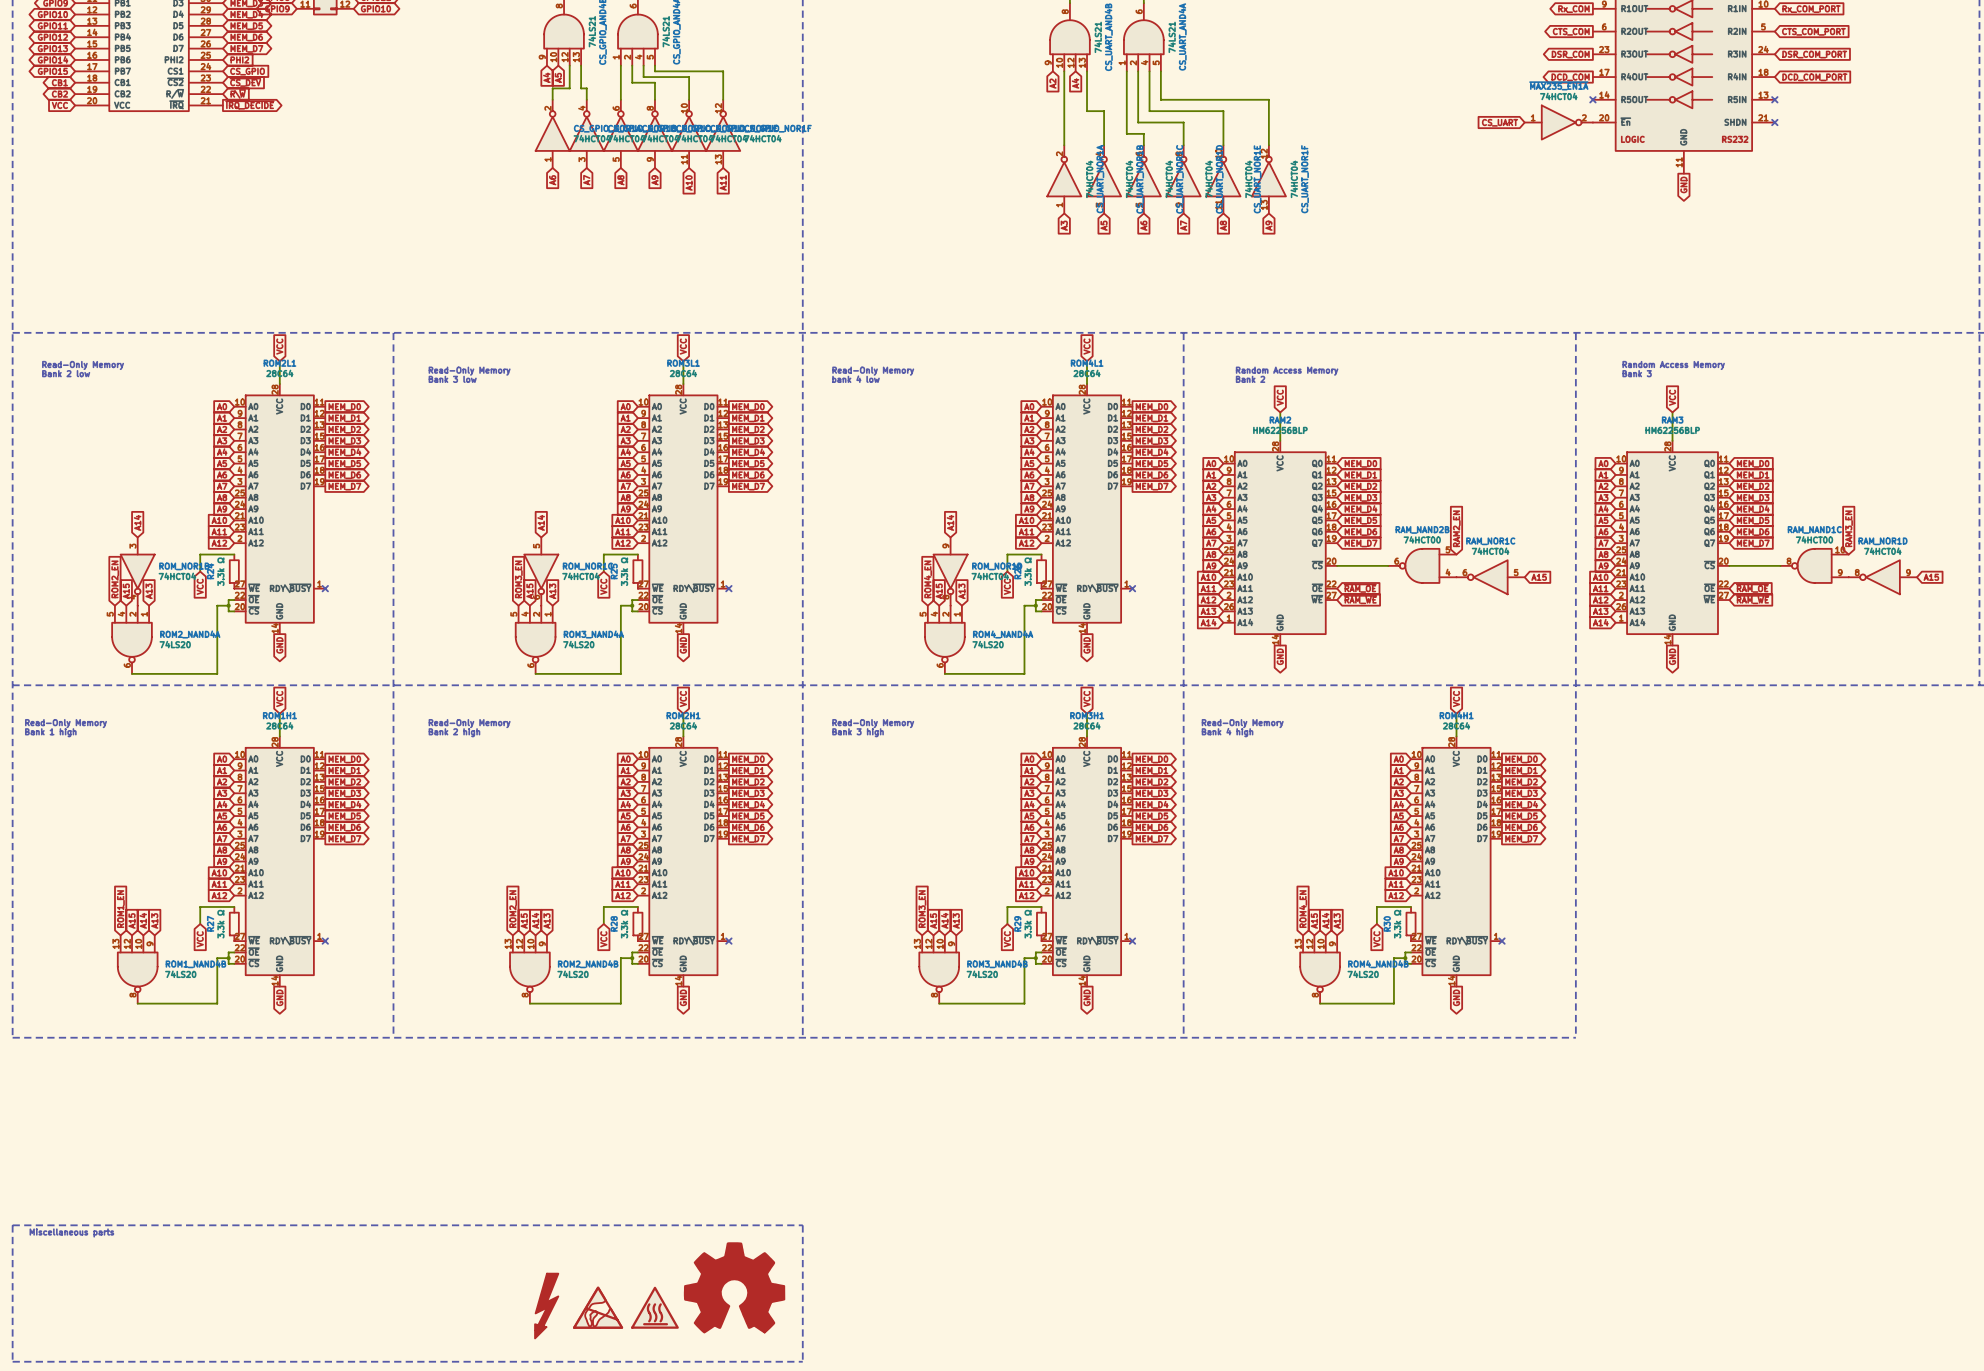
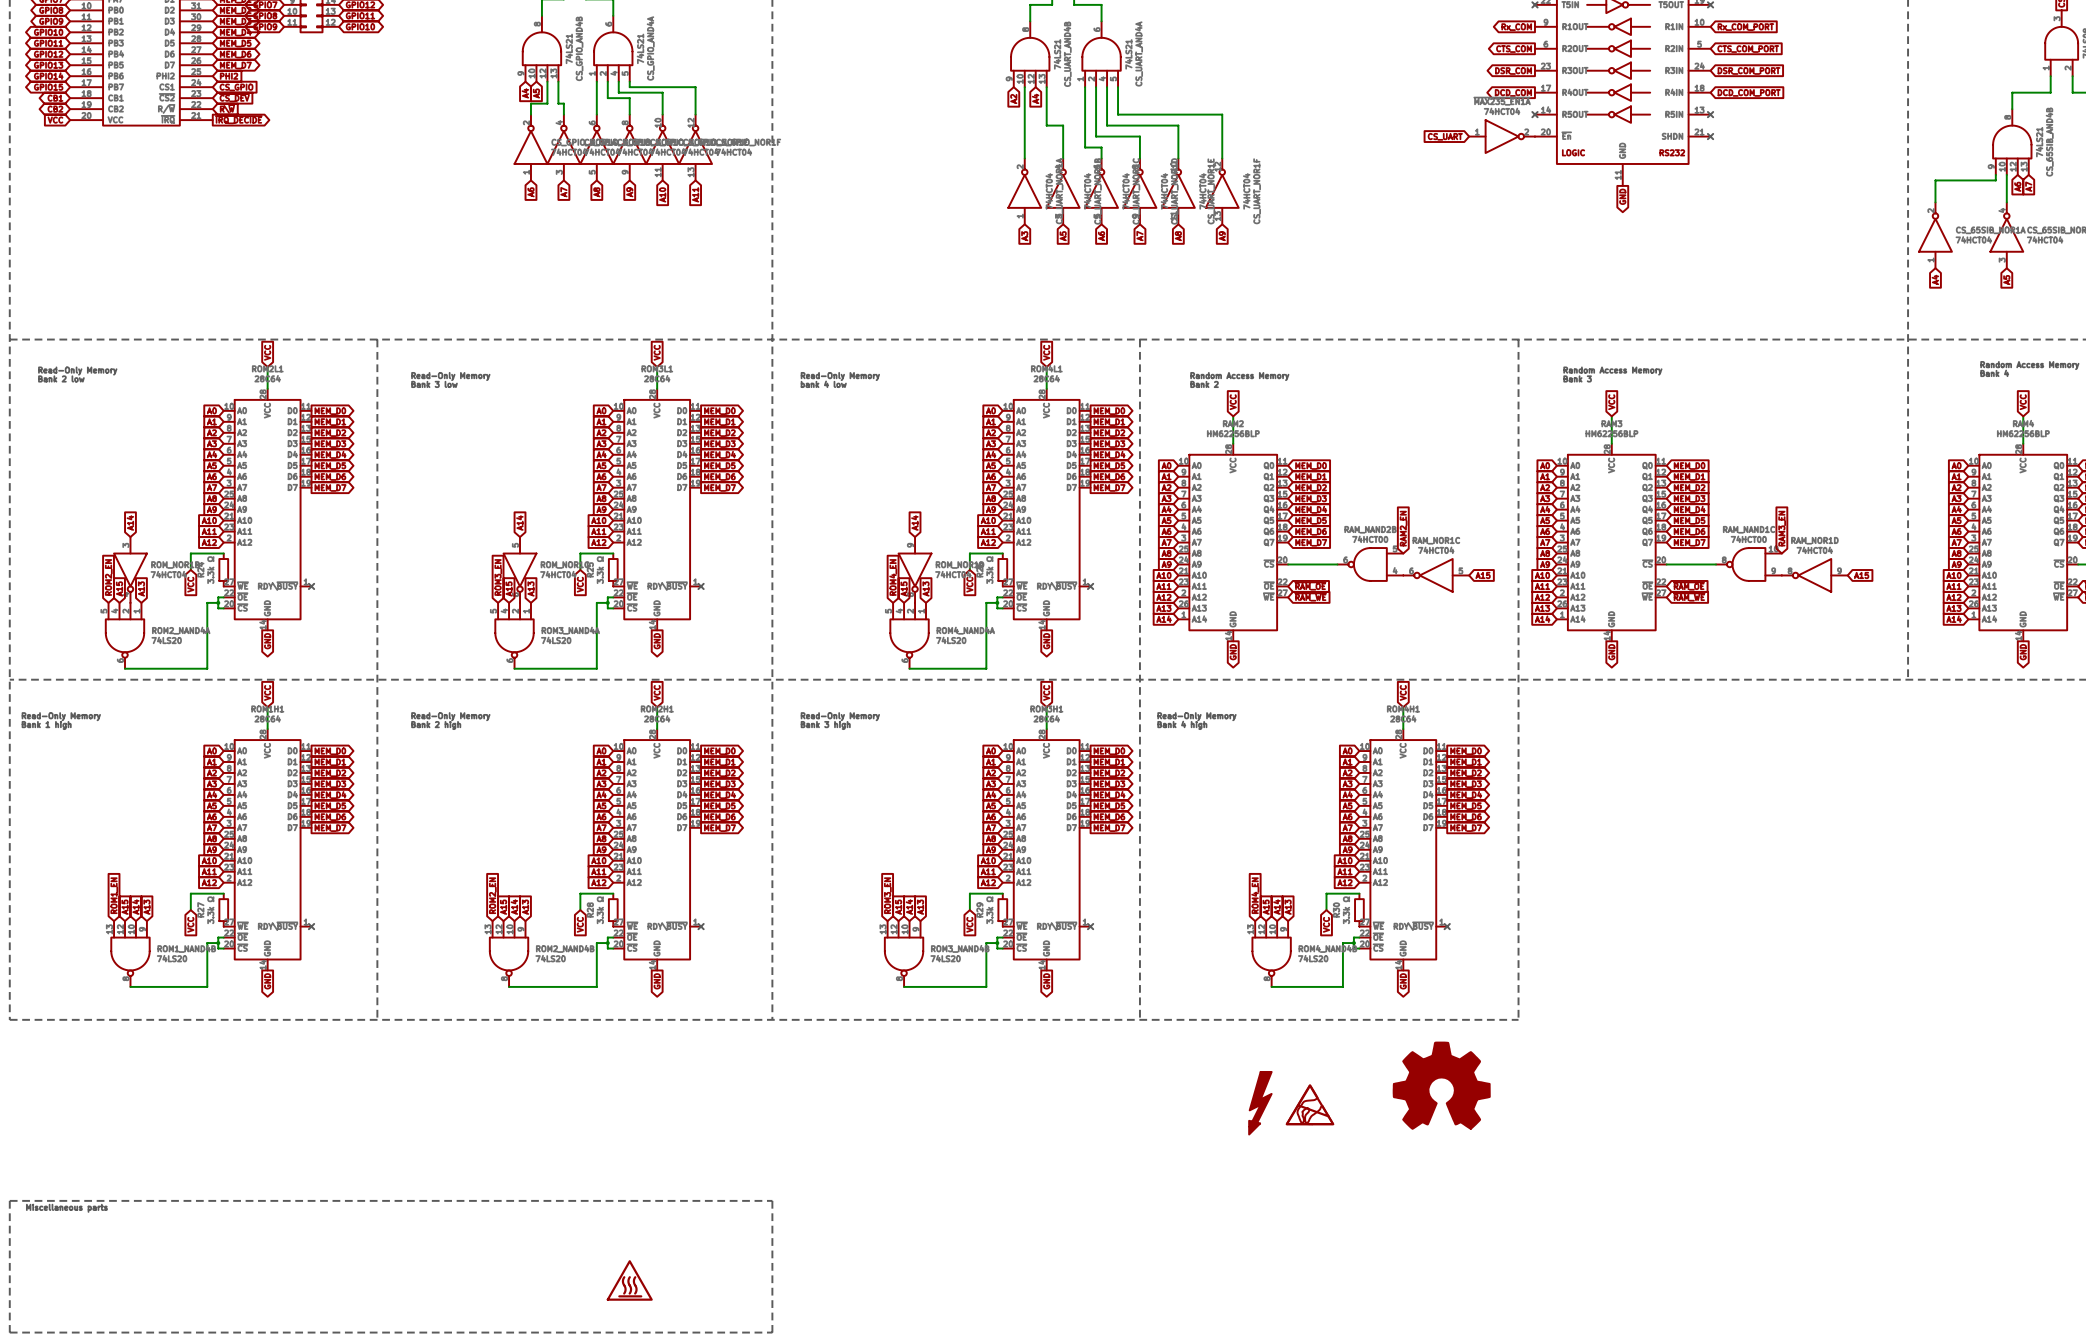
power symbol: none -> (1441, 1085)
power symbol: none -> (1260, 1103)
power symbol: none -> (1310, 1104)
power symbol: (734, 1287) -> none
power symbol: (546, 1306) -> none
power symbol: (598, 1307) -> none

